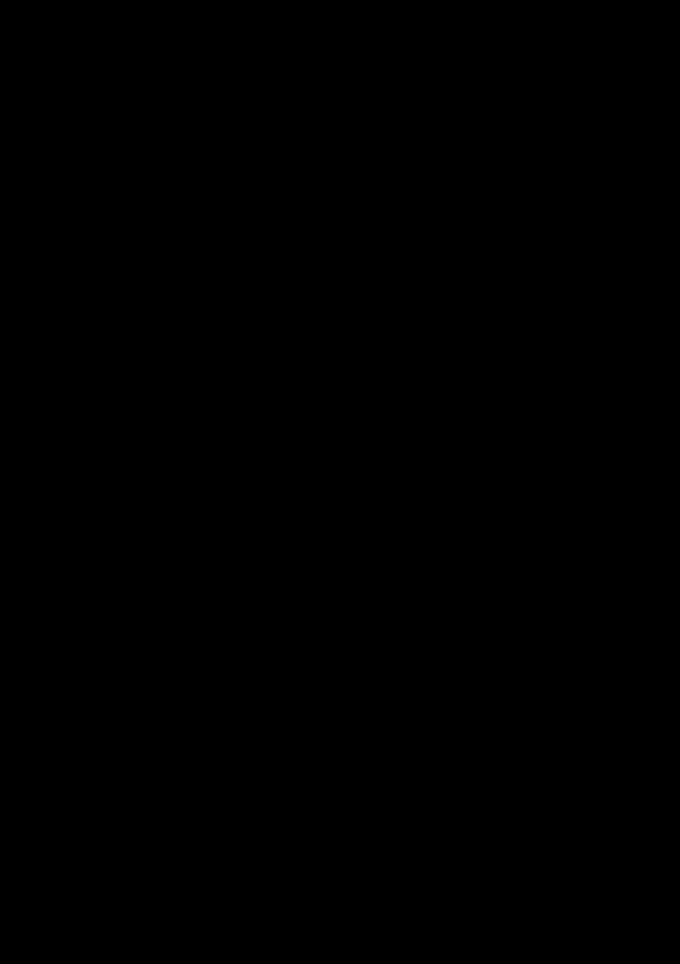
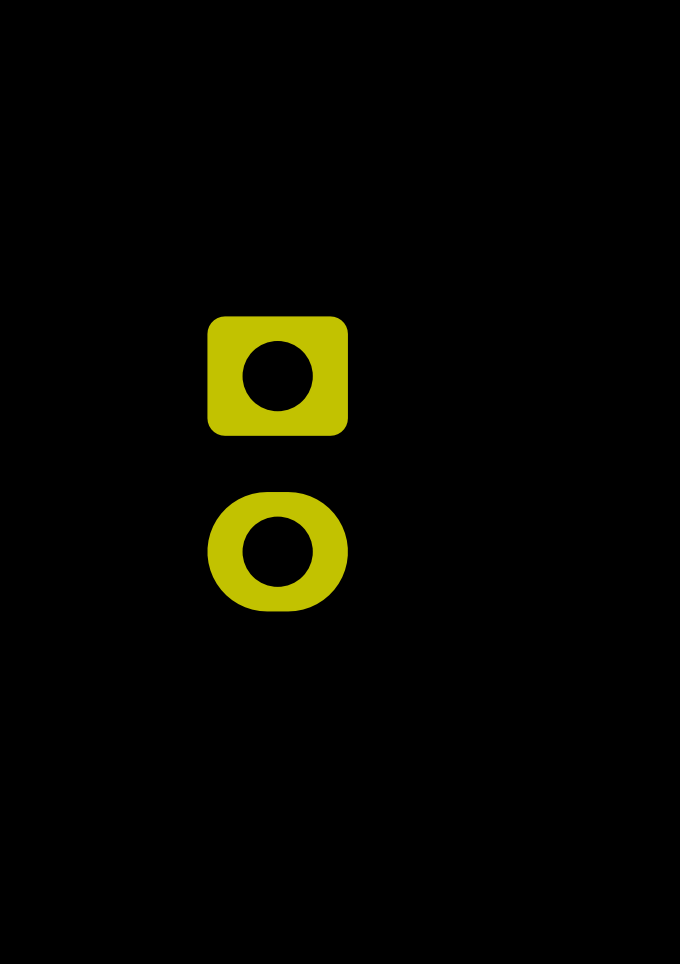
part: none -> (277, 463)

